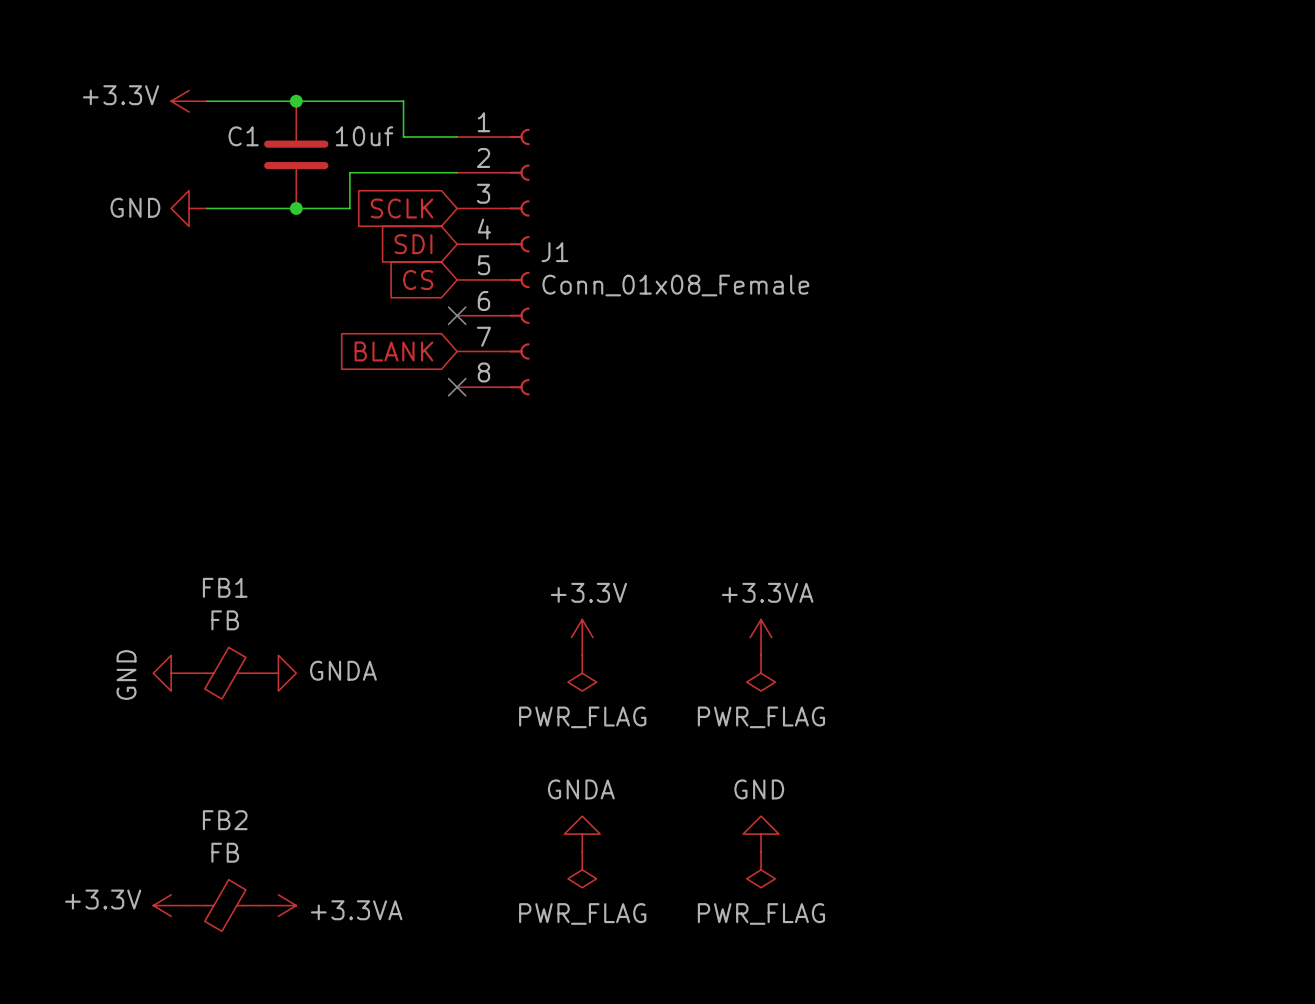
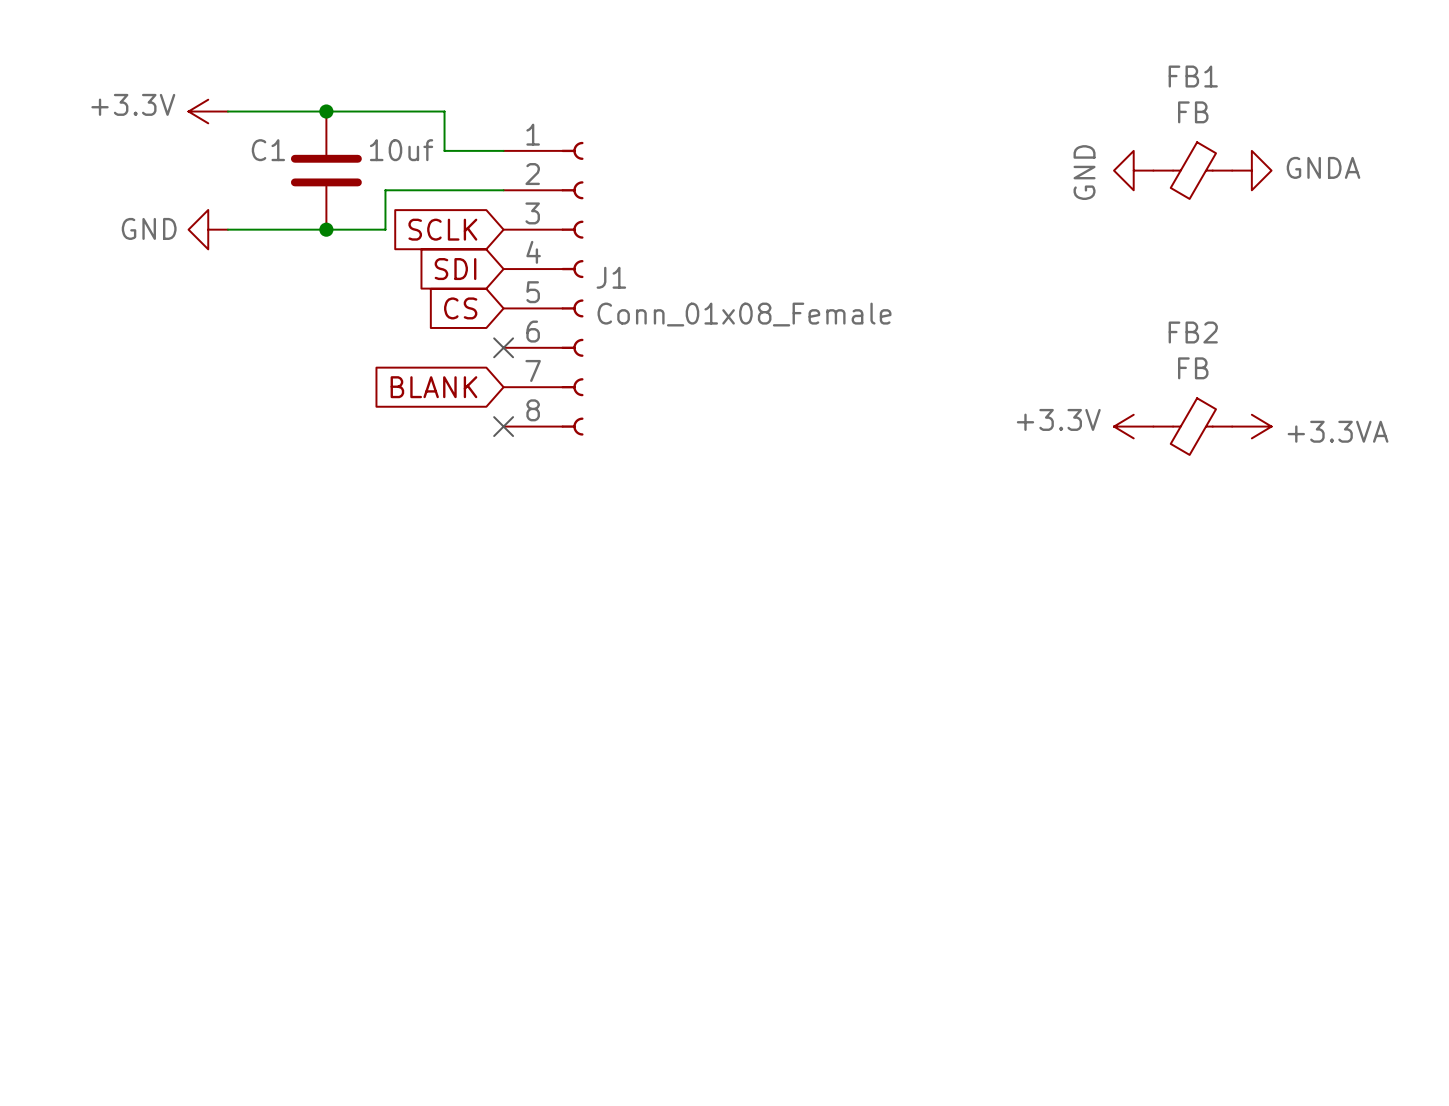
power symbol: none -> GND (1133, 170)
power symbol: none -> GNDA (1251, 170)
power symbol: none -> +3.3V (1133, 426)
power symbol: none -> +3.3VA (1251, 426)
power symbol: +3.3V (582, 637) -> none
power symbol: +3.3VA (761, 637) -> none
power symbol: GND (171, 673) -> none
FB1 position: (224, 673) -> (1192, 170)
power symbol: GNDA (278, 673) -> none
power symbol: PWR_FLAG (582, 673) -> none
power symbol: PWR_FLAG (761, 673) -> none
power symbol: GNDA (582, 834) -> none
power symbol: GND (761, 834) -> none
power symbol: PWR_FLAG (582, 869) -> none
power symbol: PWR_FLAG (761, 869) -> none
power symbol: +3.3V (171, 905) -> none
FB2 position: (224, 905) -> (1192, 426)
power symbol: +3.3VA (278, 905) -> none

